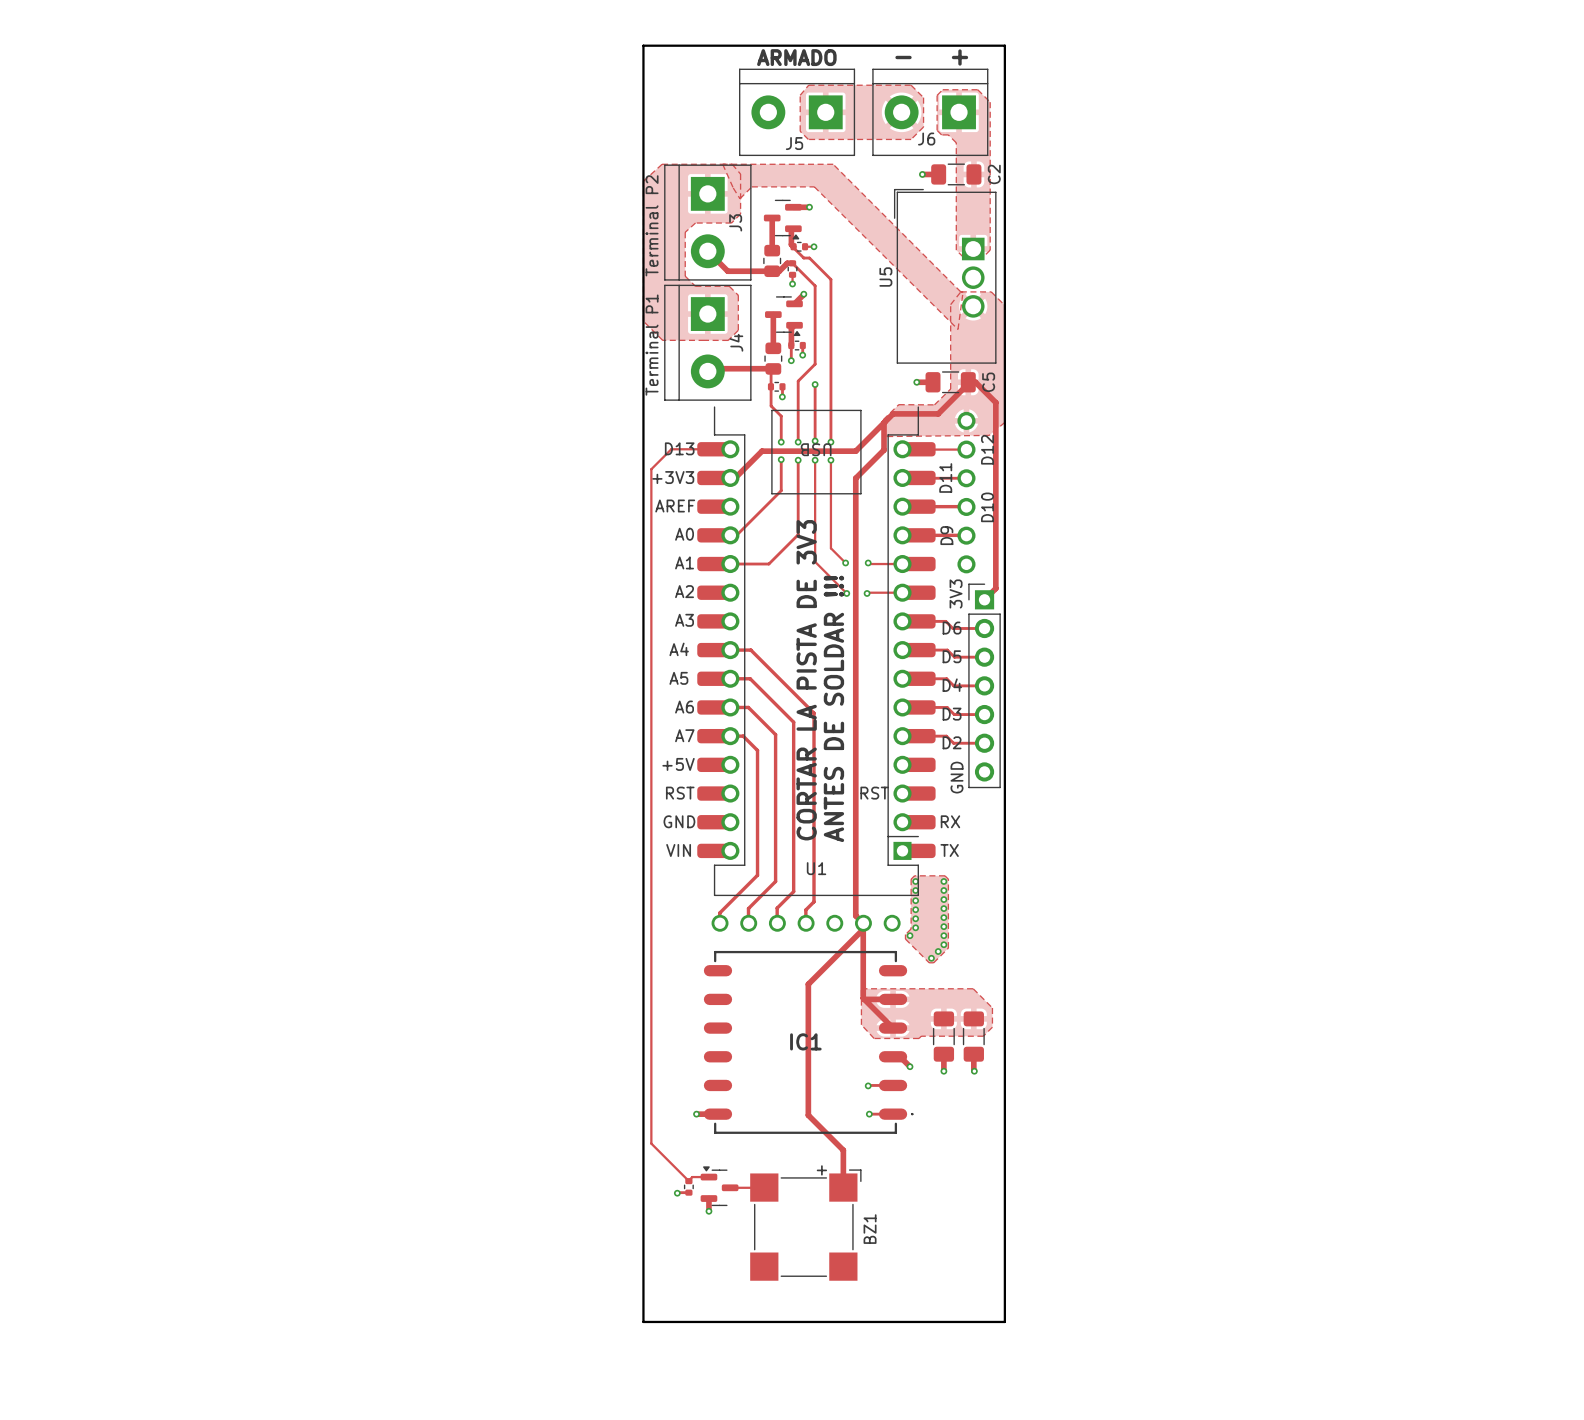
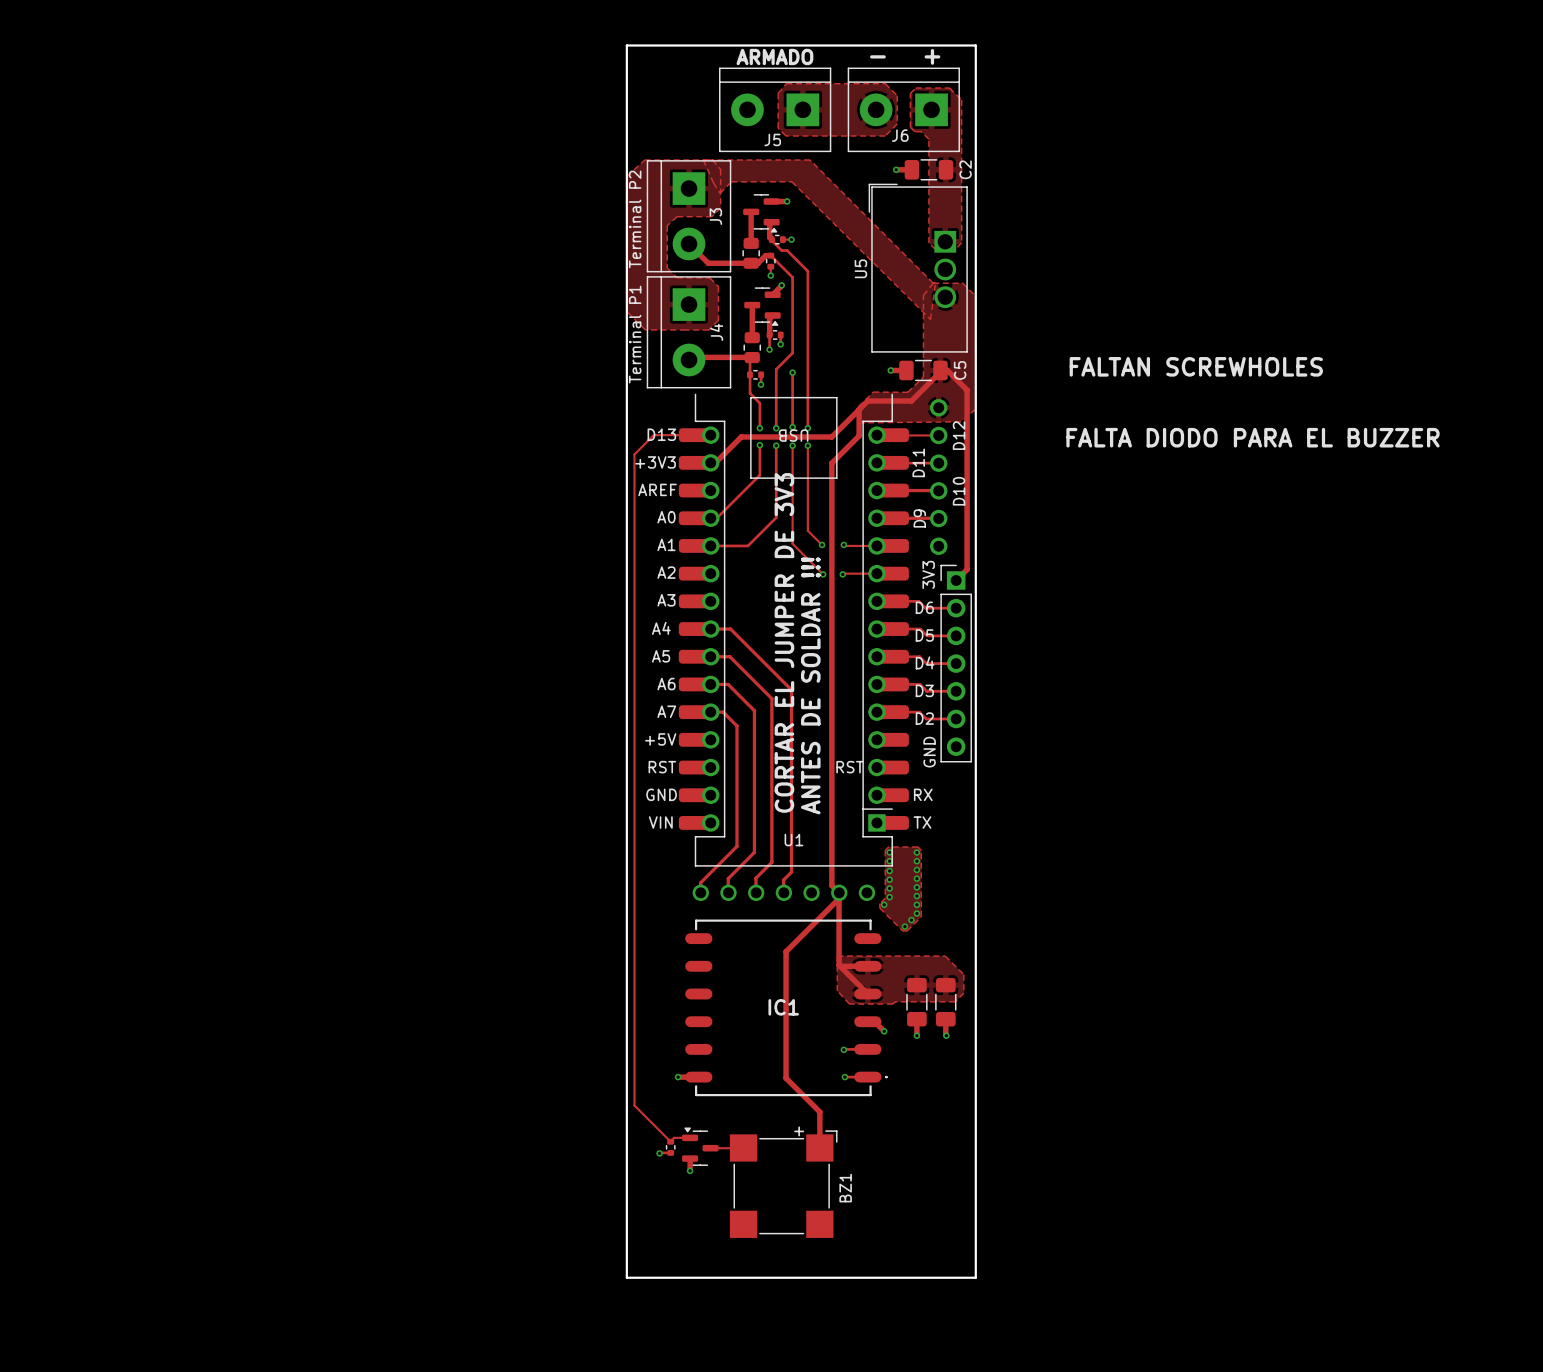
text: none -> FALTAN SCREWHOLES (1196, 366)
text: none -> FALTA DIODO PARA EL BUZZER (1252, 437)
text: CORTAR LA PISTA DE 3V3 (806, 680) -> CORTAR EL JUMPER DE 3V3 (784, 642)

